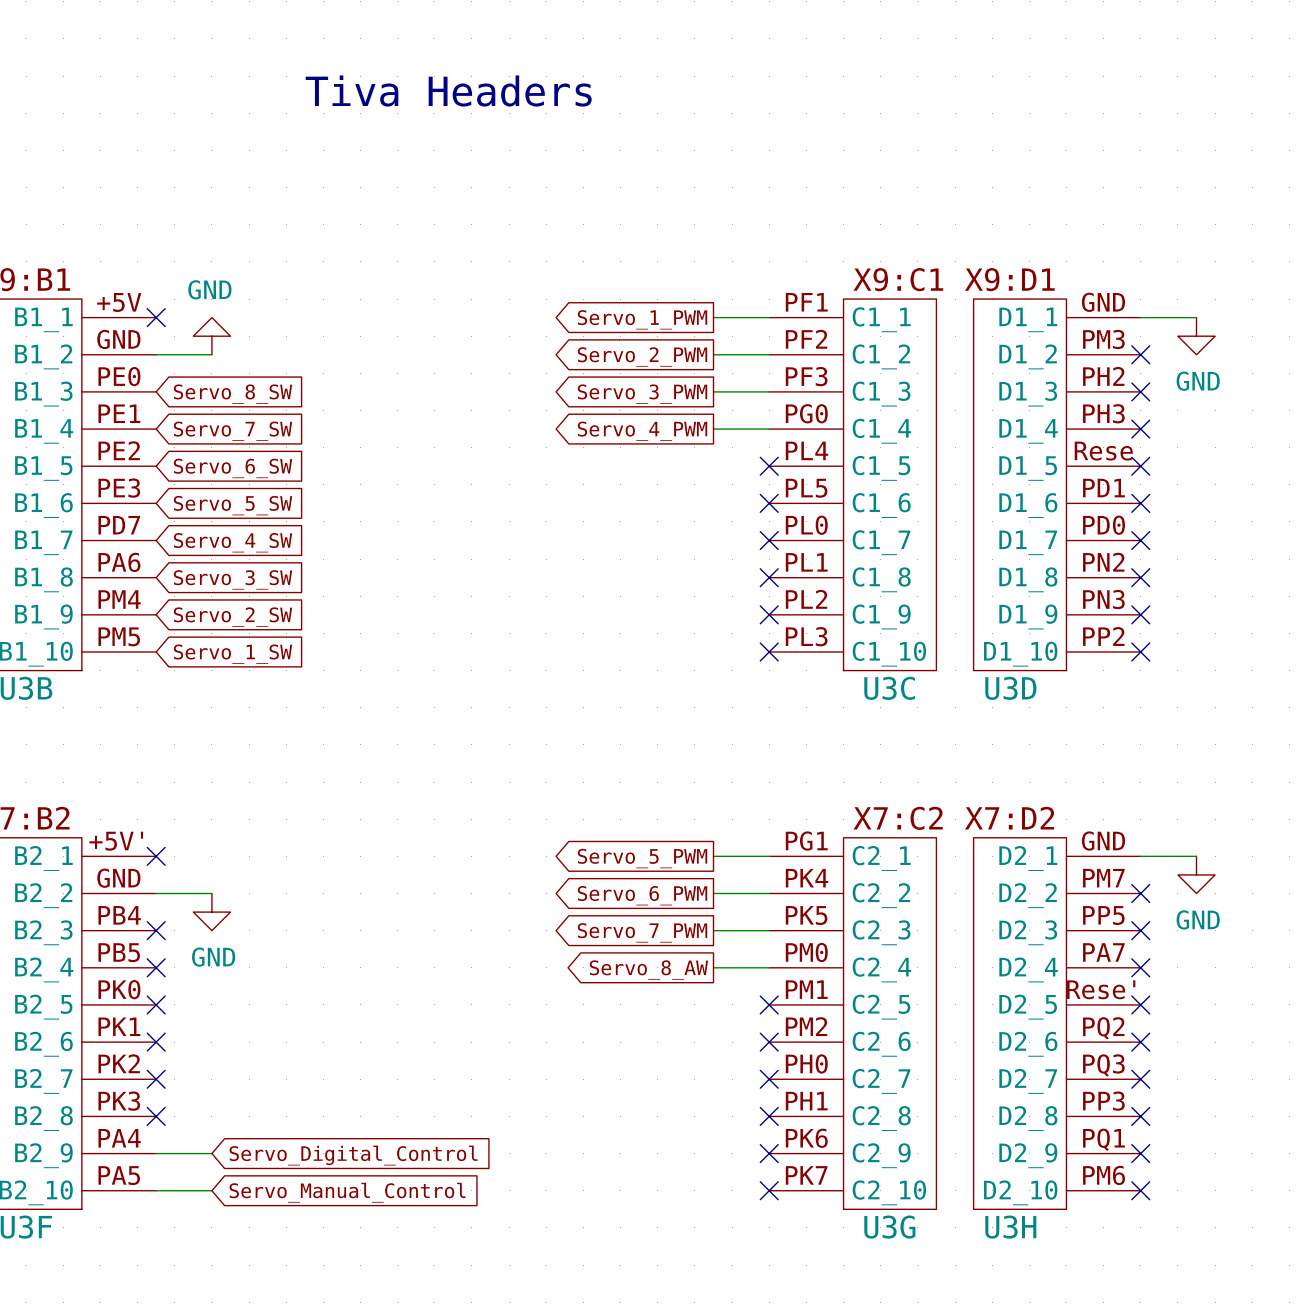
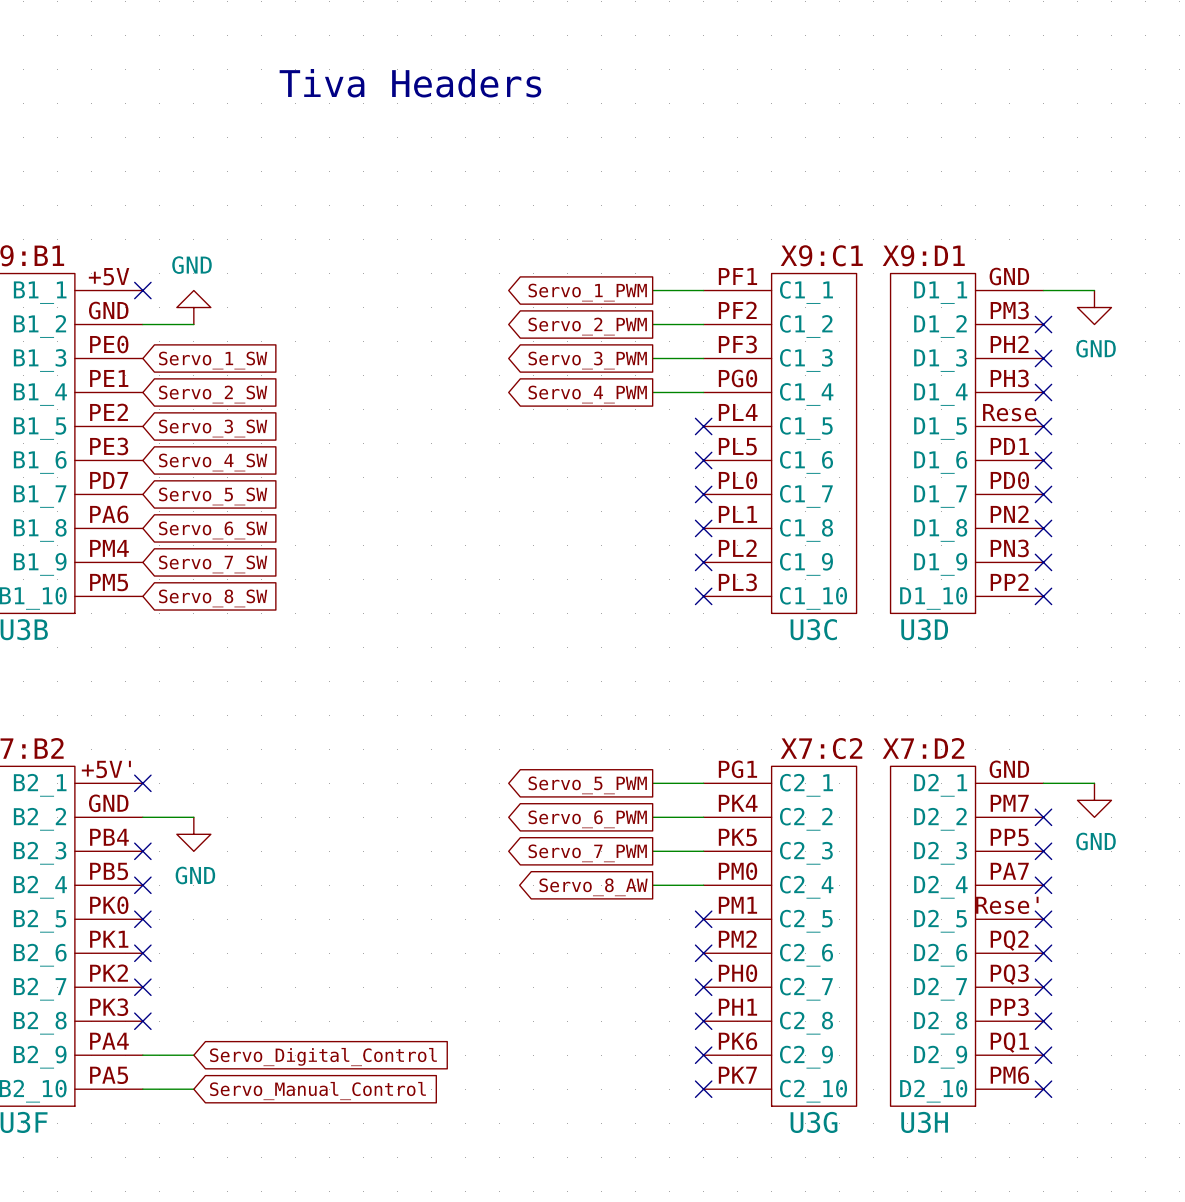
global label: Servo_8_SW (232, 394) -> Servo_1_SW (213, 360)
global label: Servo_7_SW (232, 431) -> Servo_2_SW (213, 394)
global label: Servo_6_SW (232, 468) -> Servo_3_SW (213, 428)
global label: Servo_5_SW (232, 505) -> Servo_4_SW (213, 462)
global label: Servo_4_SW (232, 542) -> Servo_5_SW (213, 496)
global label: Servo_3_SW (232, 579) -> Servo_6_SW (213, 530)
global label: Servo_2_SW (232, 617) -> Servo_7_SW (213, 564)
global label: Servo_1_SW (232, 654) -> Servo_8_SW (213, 598)

